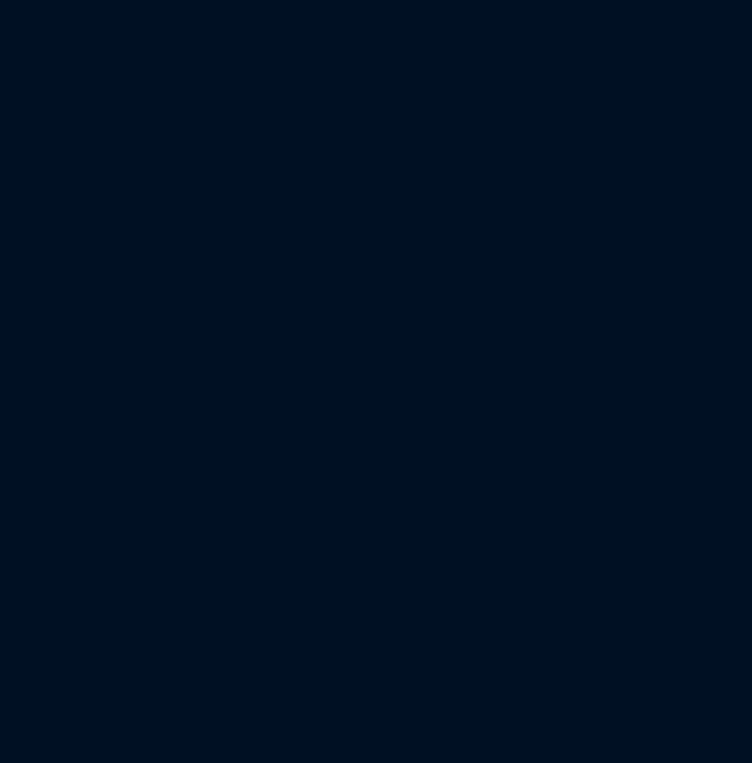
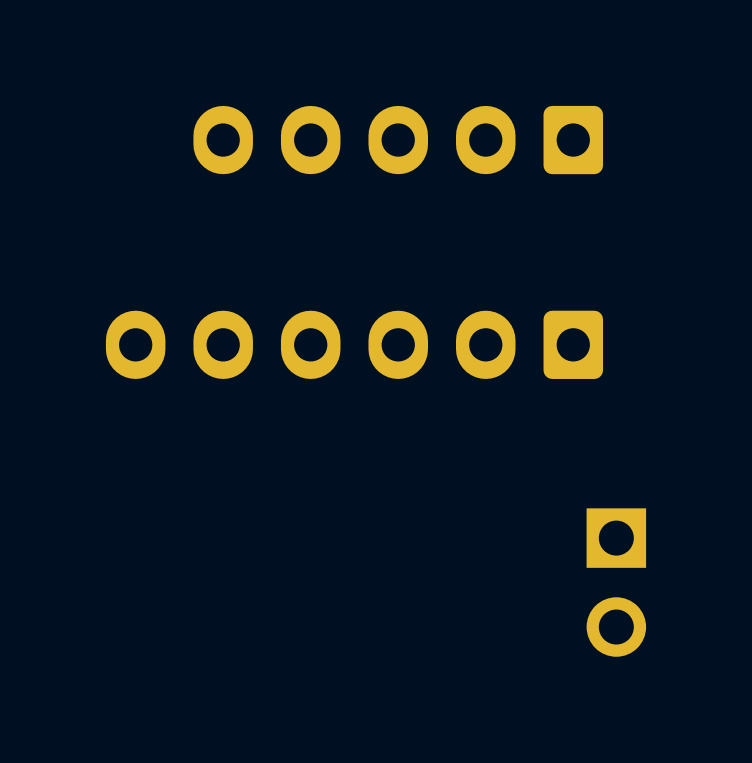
part: none -> (398, 140)
part: none -> (354, 344)
part: none -> (616, 582)

